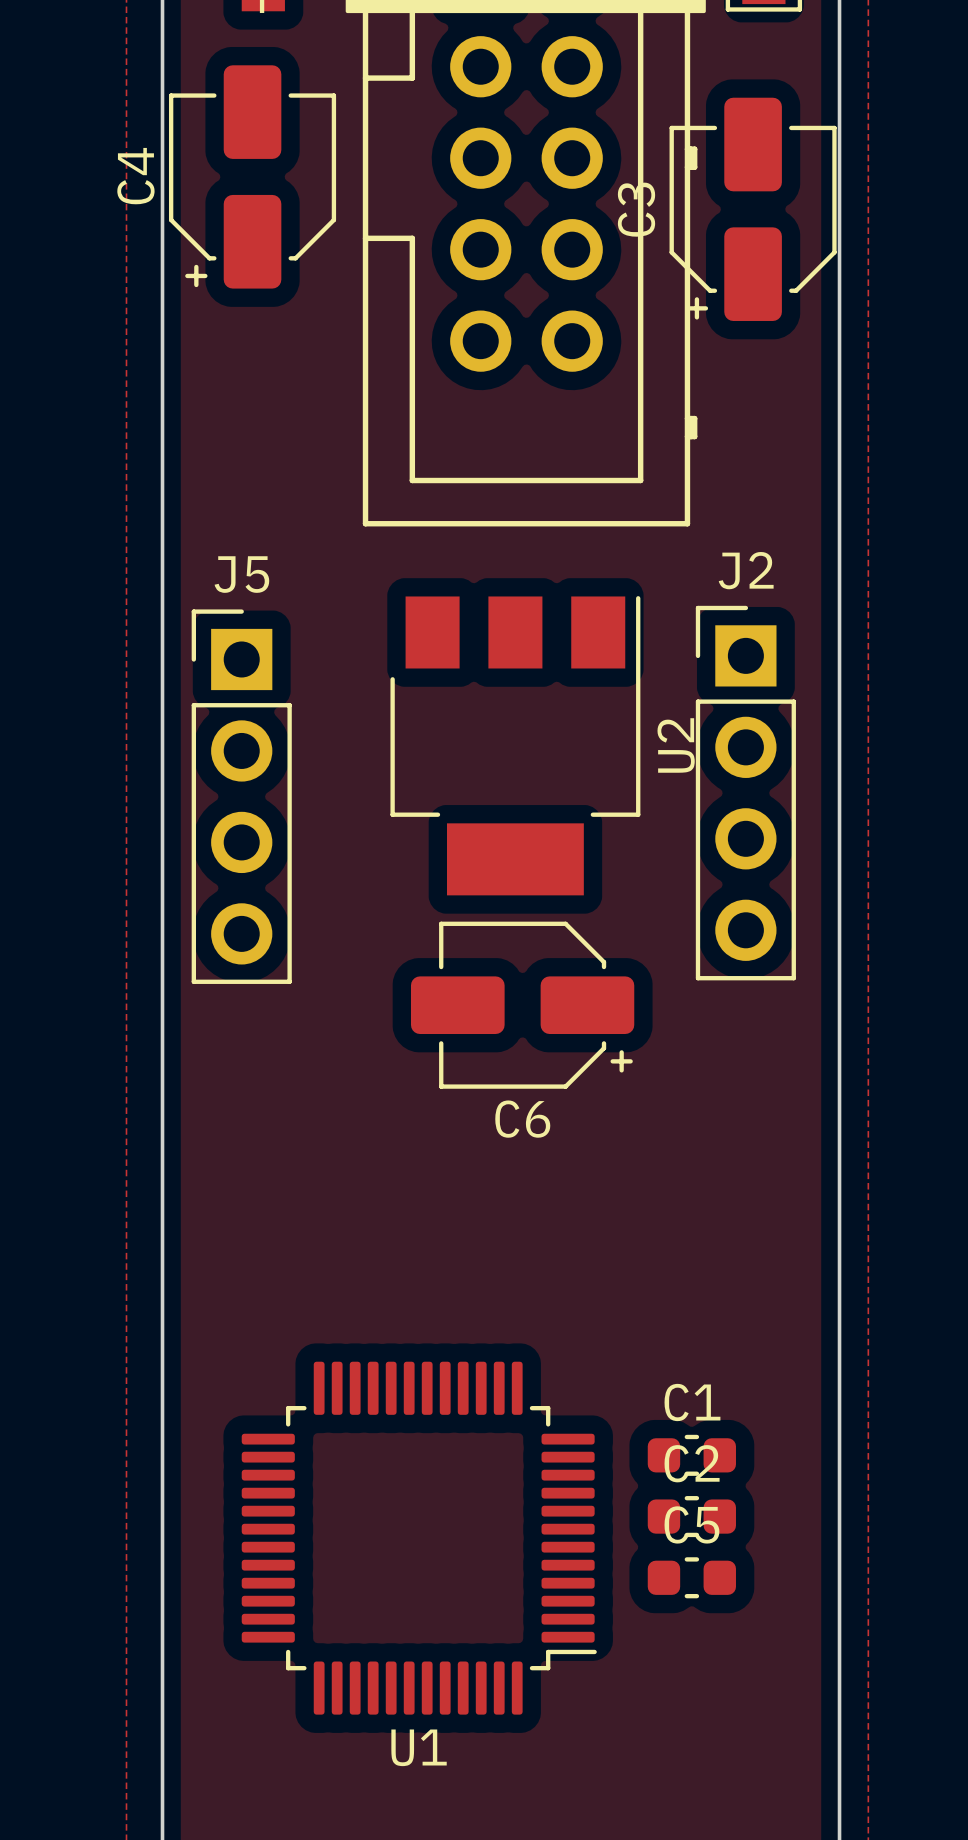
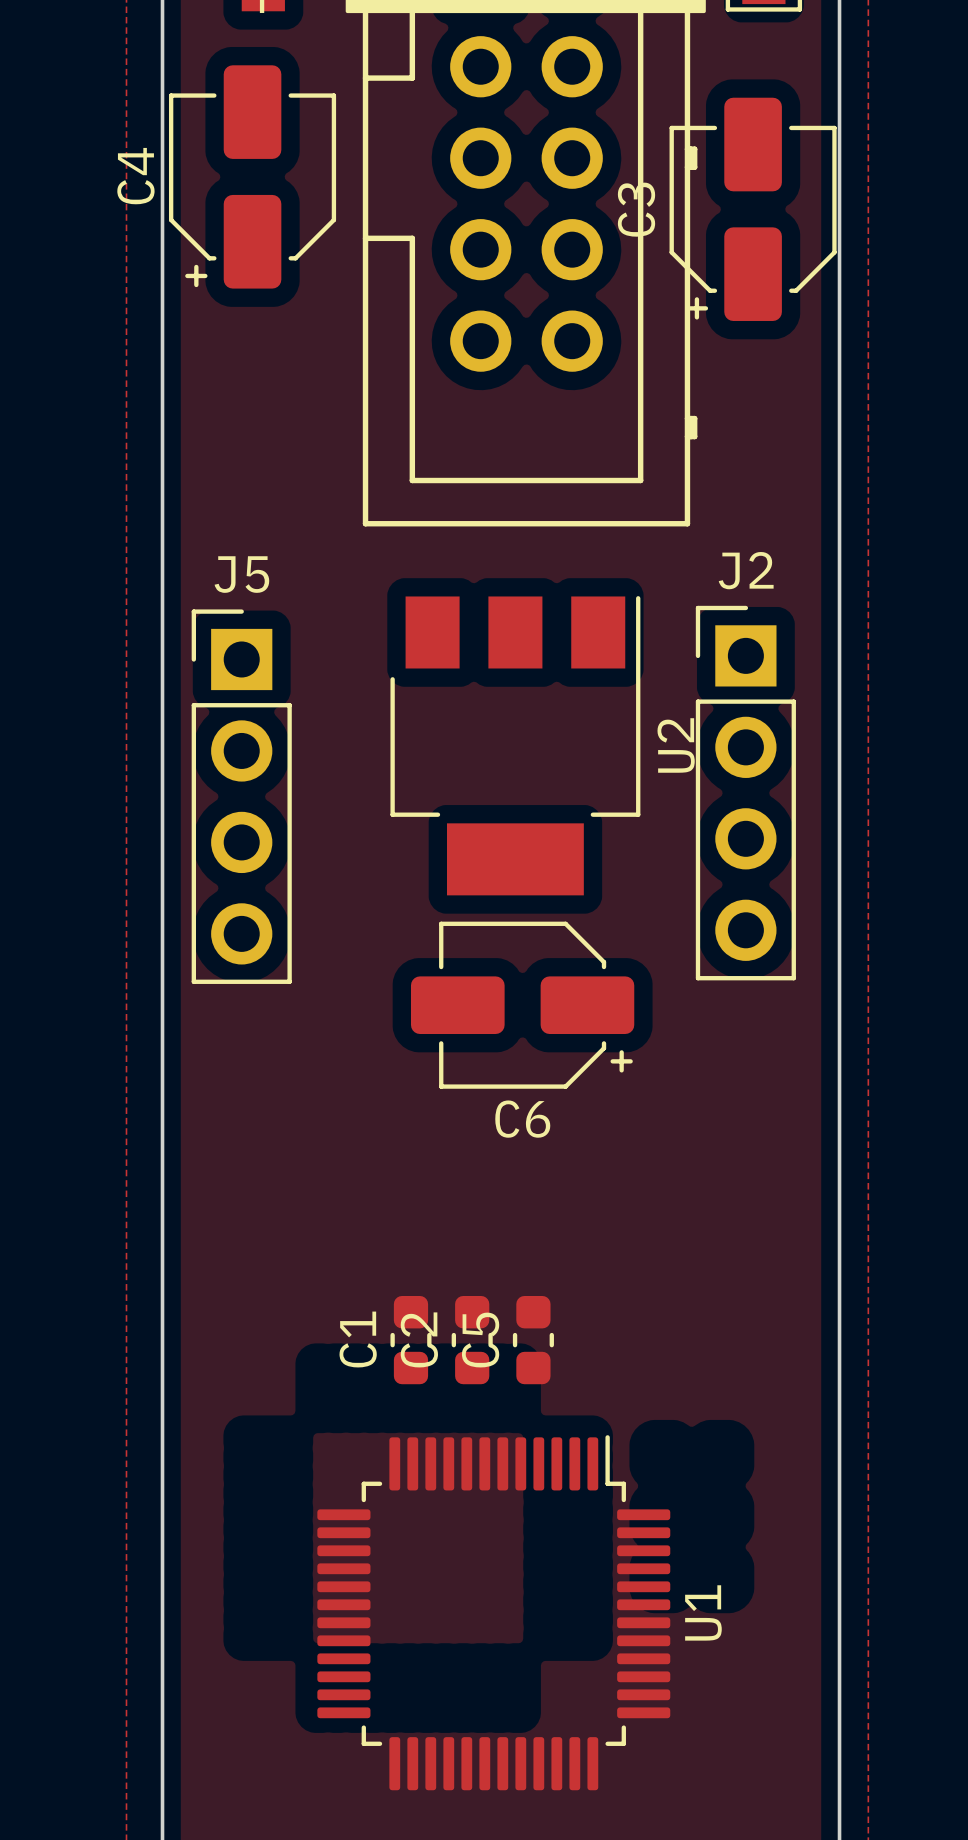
C1 name position: C1 (692, 1402) -> C1 (358, 1339)
C1 rotation: 0° (691, 1455) -> 90° clockwise (410, 1340)
C1 position: (691, 1455) -> (410, 1340)
C2 name position: C2 (692, 1463) -> C2 (419, 1339)
C2 rotation: 0° (691, 1516) -> 90° clockwise (472, 1340)
C2 position: (691, 1516) -> (472, 1340)
C5 name position: C5 (691, 1524) -> C5 (480, 1340)
U1 rotation: 0° (419, 1538) -> 90° counterclockwise (493, 1612)
C5 rotation: 0° (691, 1577) -> 90° clockwise (533, 1340)
C5 position: (691, 1577) -> (533, 1340)

